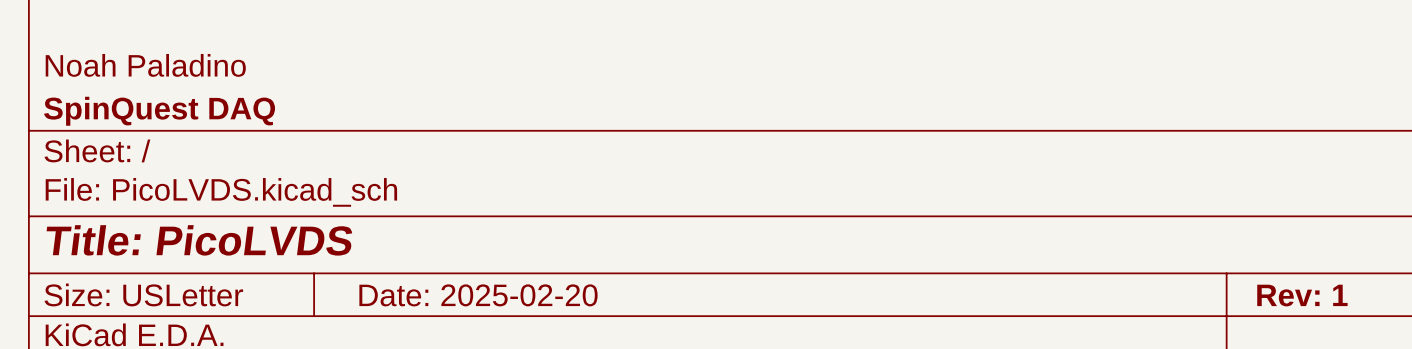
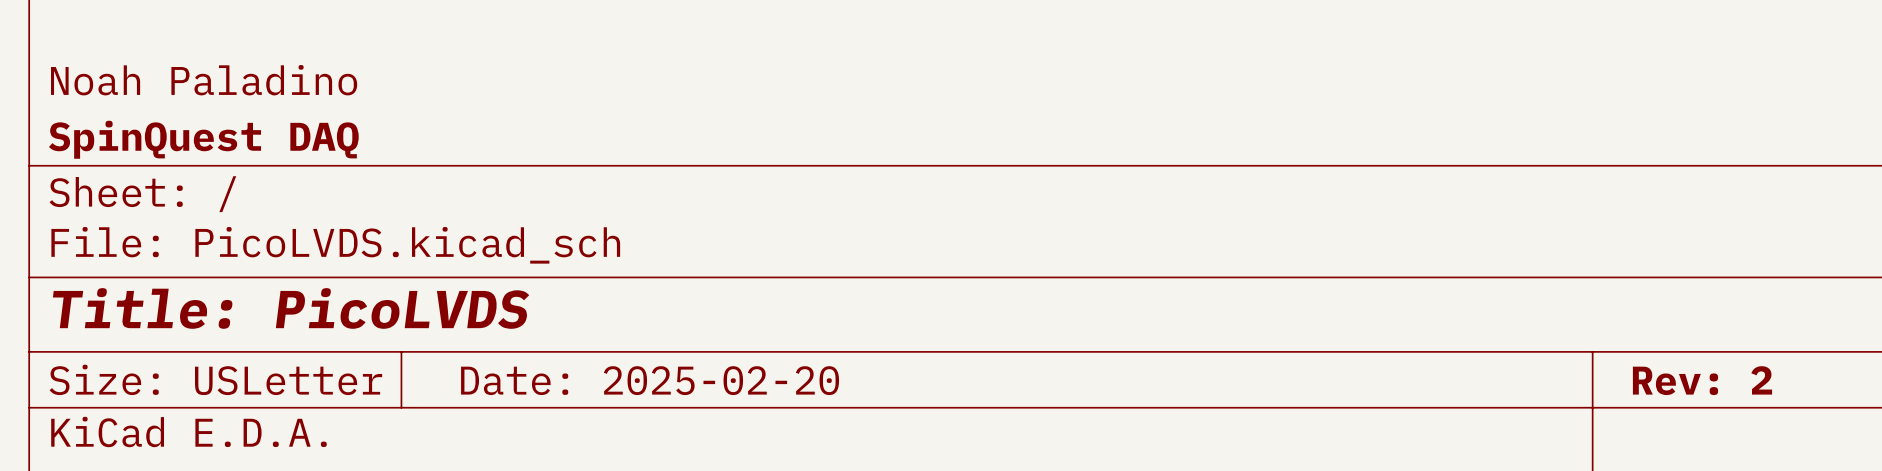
title block: Rev: 1 (1302, 295) -> Rev: 2 (1702, 380)

